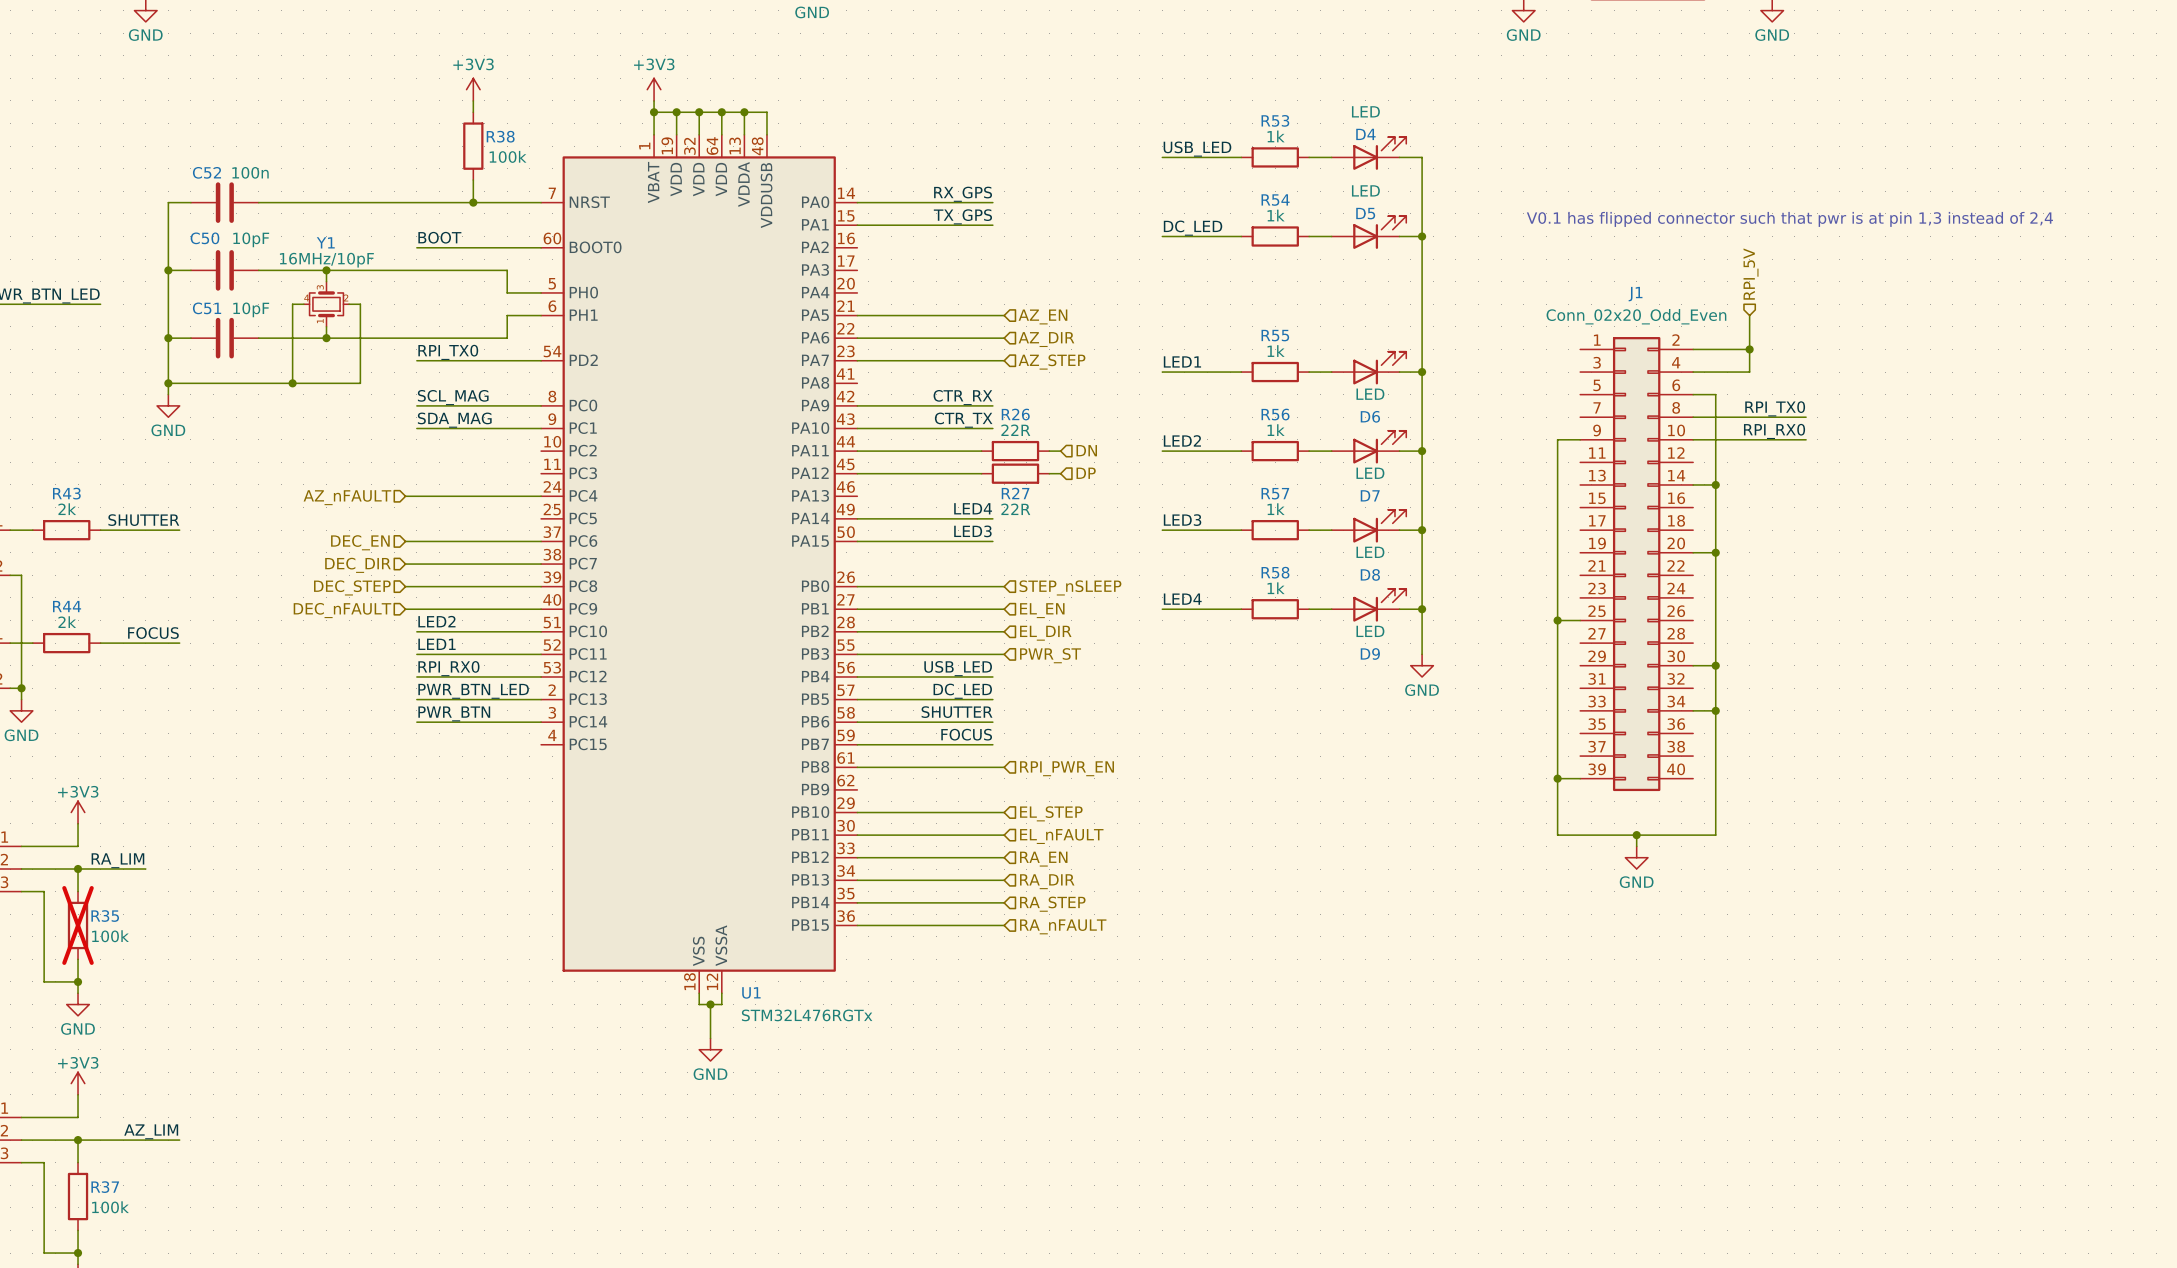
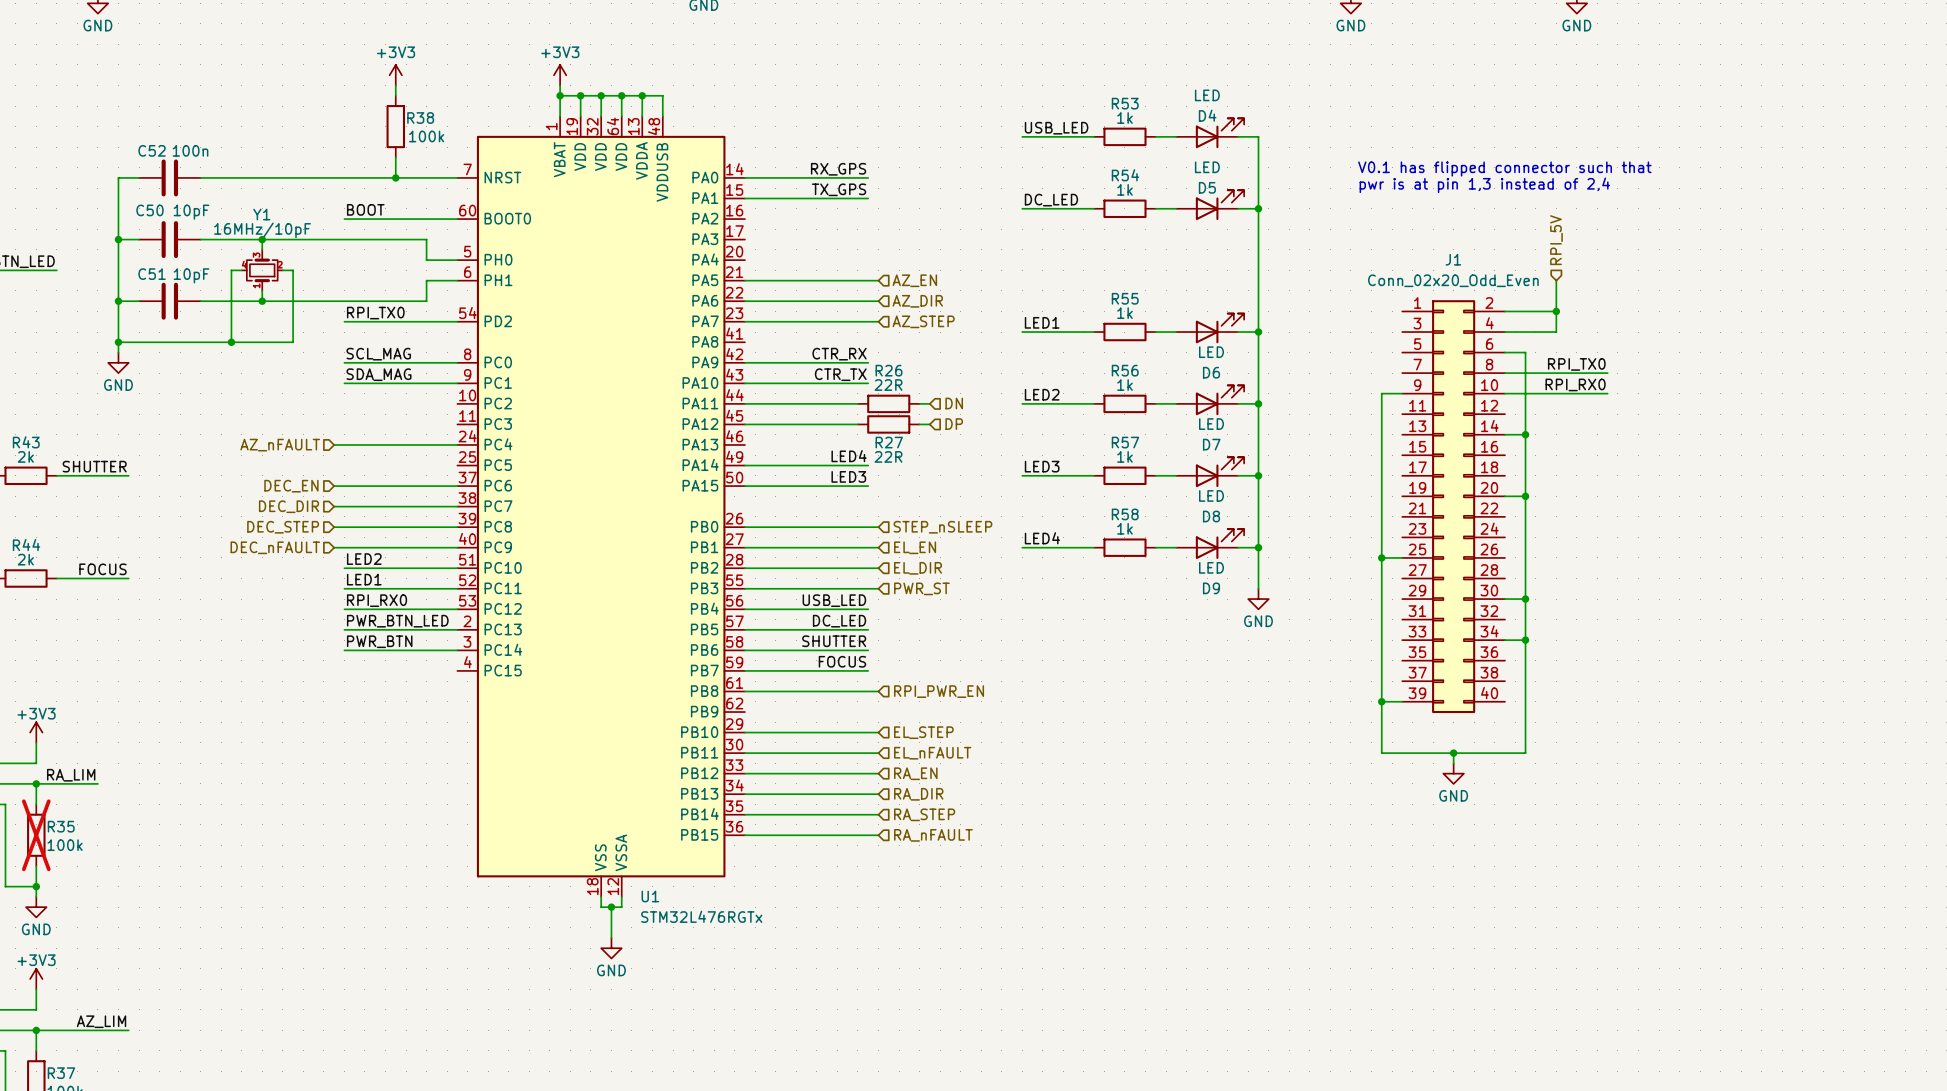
text: none -> V0.1 has flipped connector such that (1504, 168)
text: none -> pwr is at pin 1,3 instead of 2,4 (1484, 185)
text: V0.1 has flipped connector such that pwr is at pin 1,3 instead of 2,4 (1789, 219) -> none

